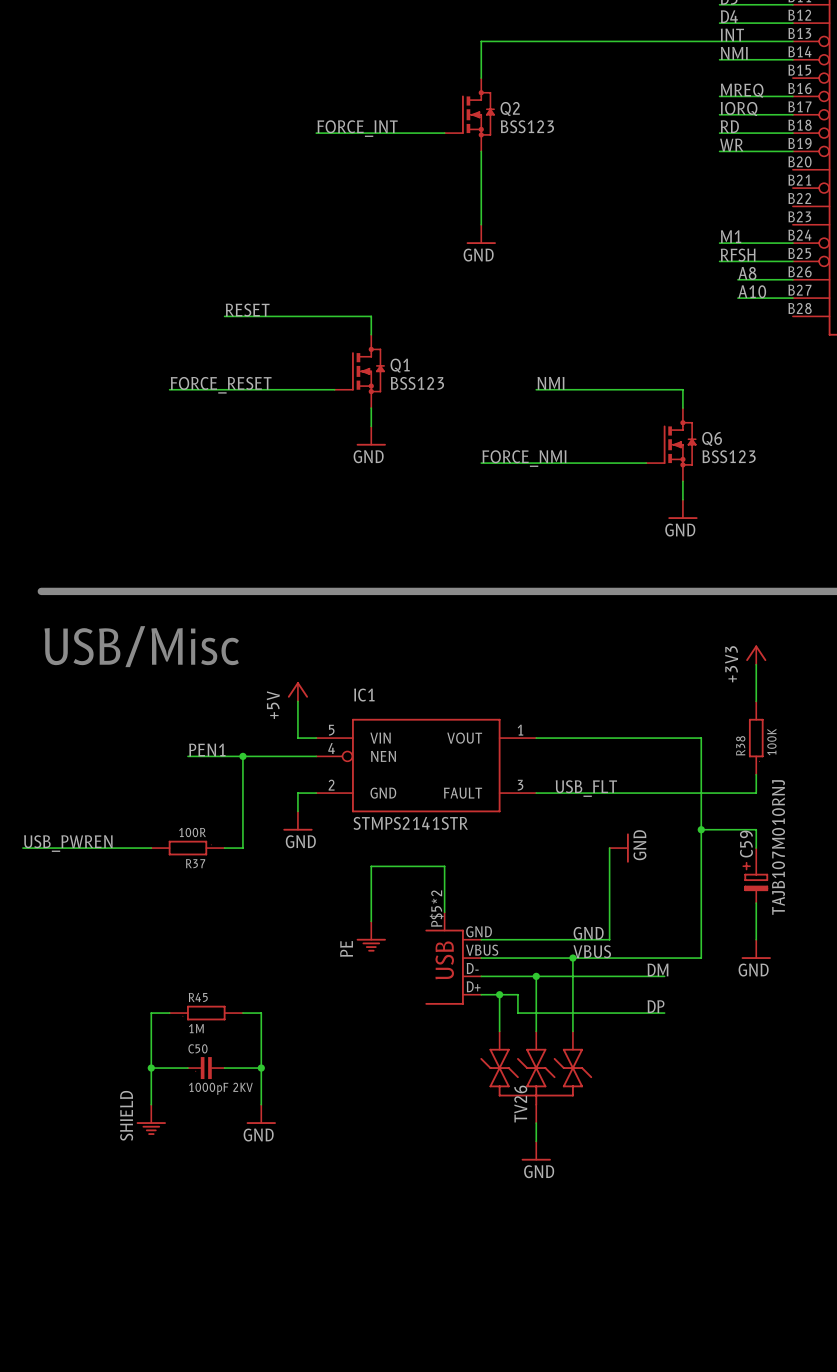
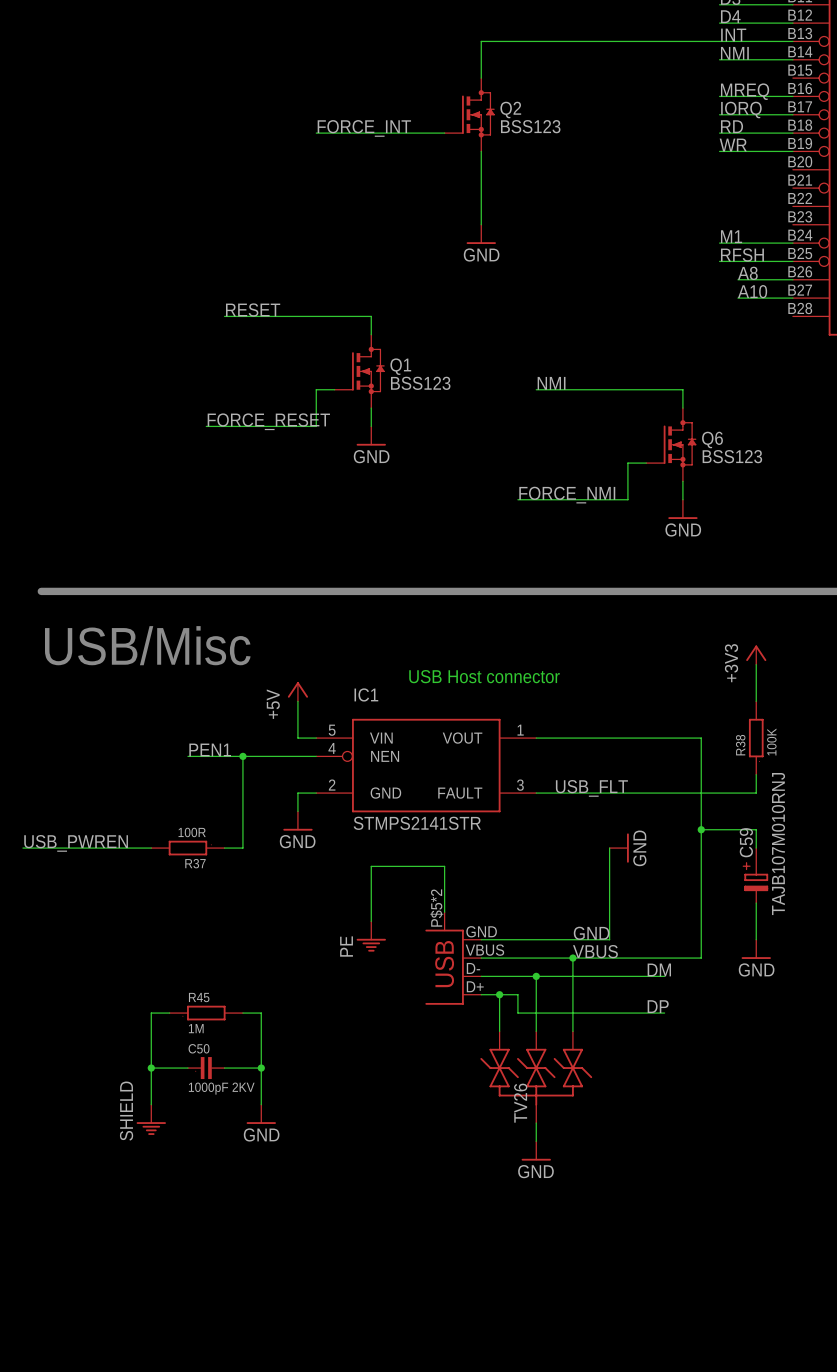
label position: FORCE_RESET (221, 385) -> FORCE_RESET (268, 421)
wire: (169, 389) (316, 389) -> (206, 426) (316, 426) (316, 389)
label position: FORCE_NMI (524, 458) -> FORCE_NMI (567, 495)
wire: (481, 463) (627, 463) -> (517, 499) (627, 499) (627, 463)
text: none -> USB Host connector (484, 676)

